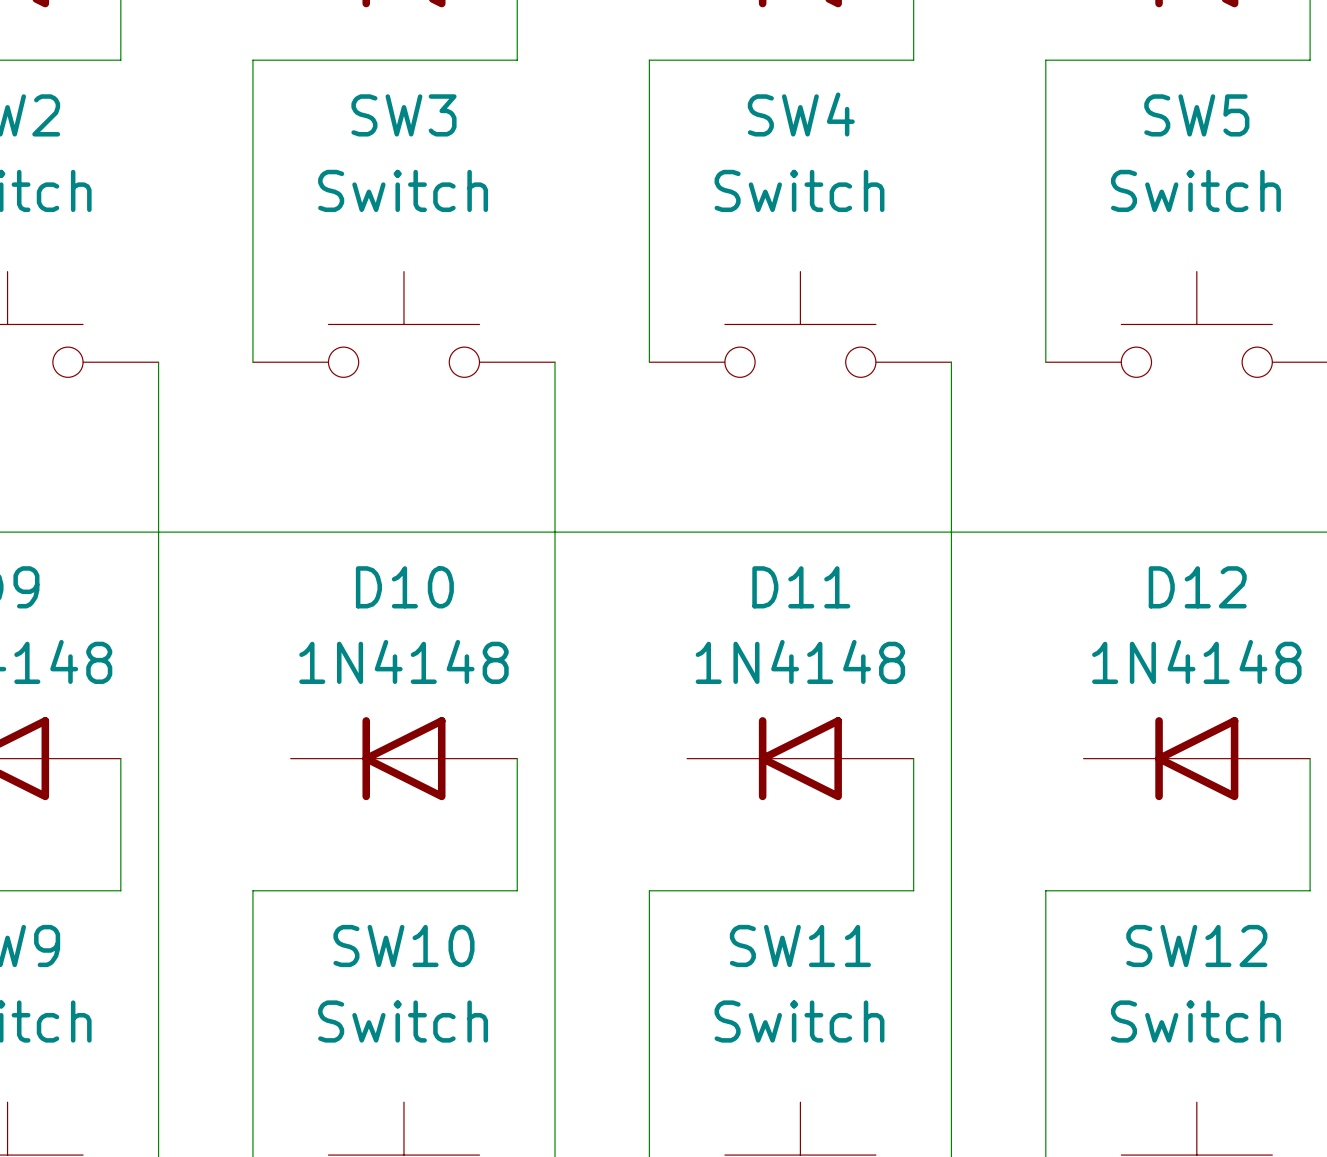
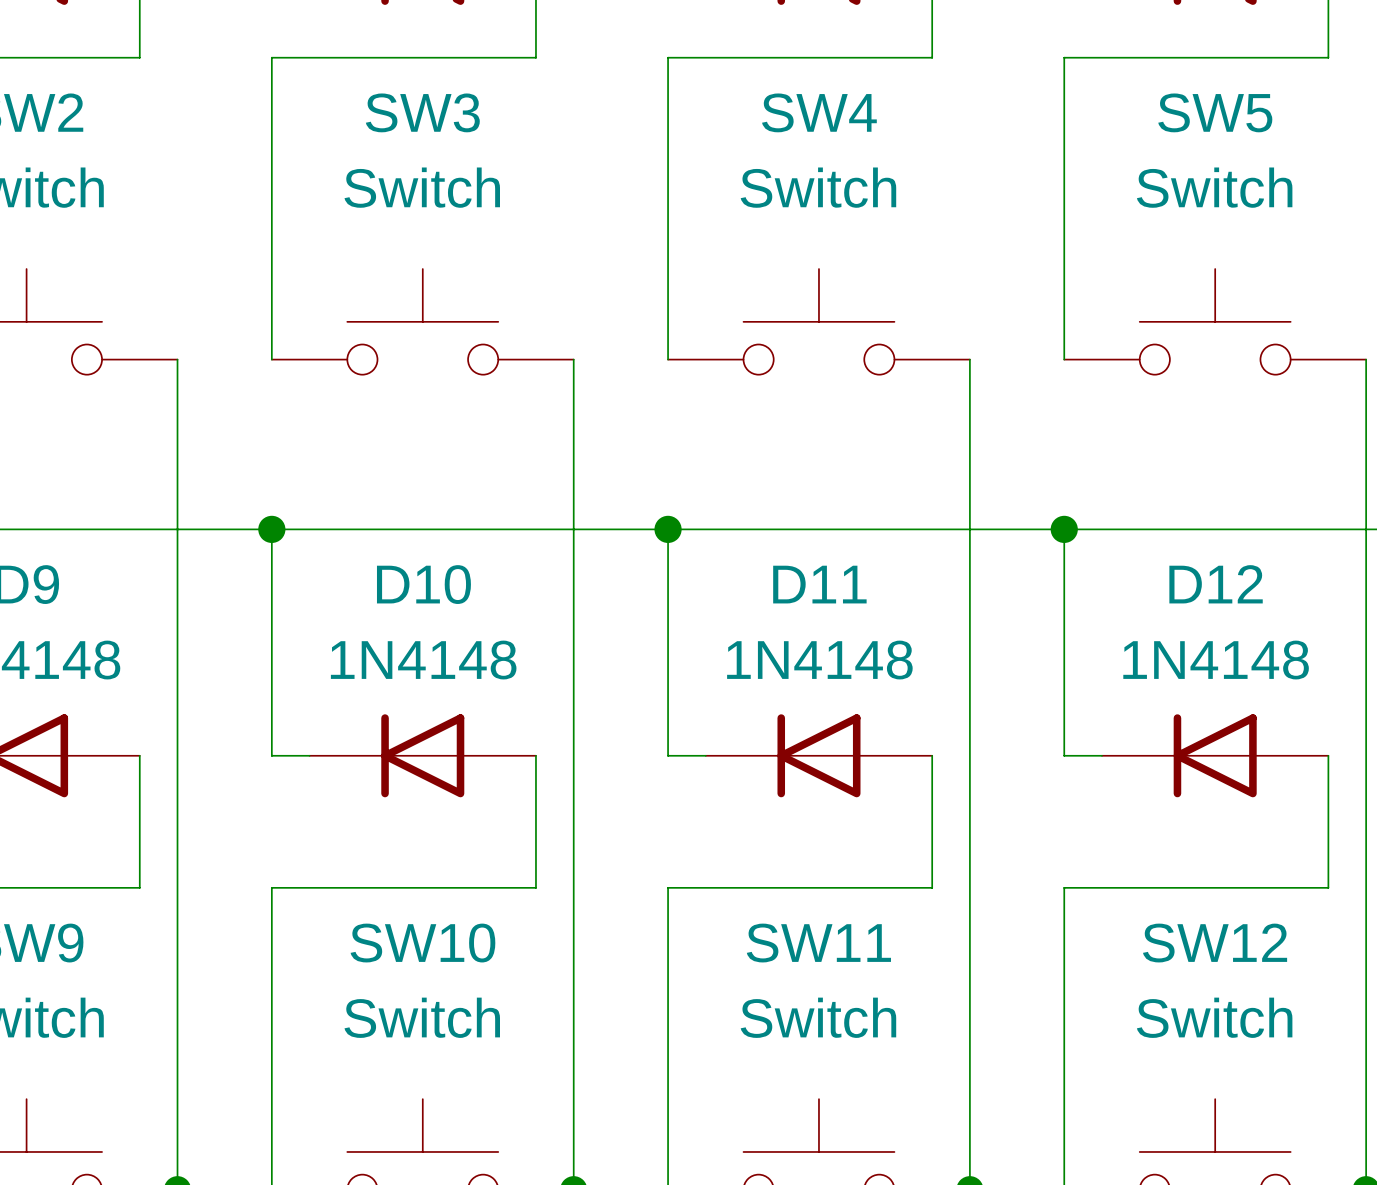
wire: none -> (271, 529) (271, 755) (309, 755)
junction: none -> (271, 529)
wire: none -> (668, 529) (668, 755) (705, 755)
junction: none -> (668, 529)
wire: none -> (1064, 529) (1064, 755) (1101, 755)
junction: none -> (1064, 529)

